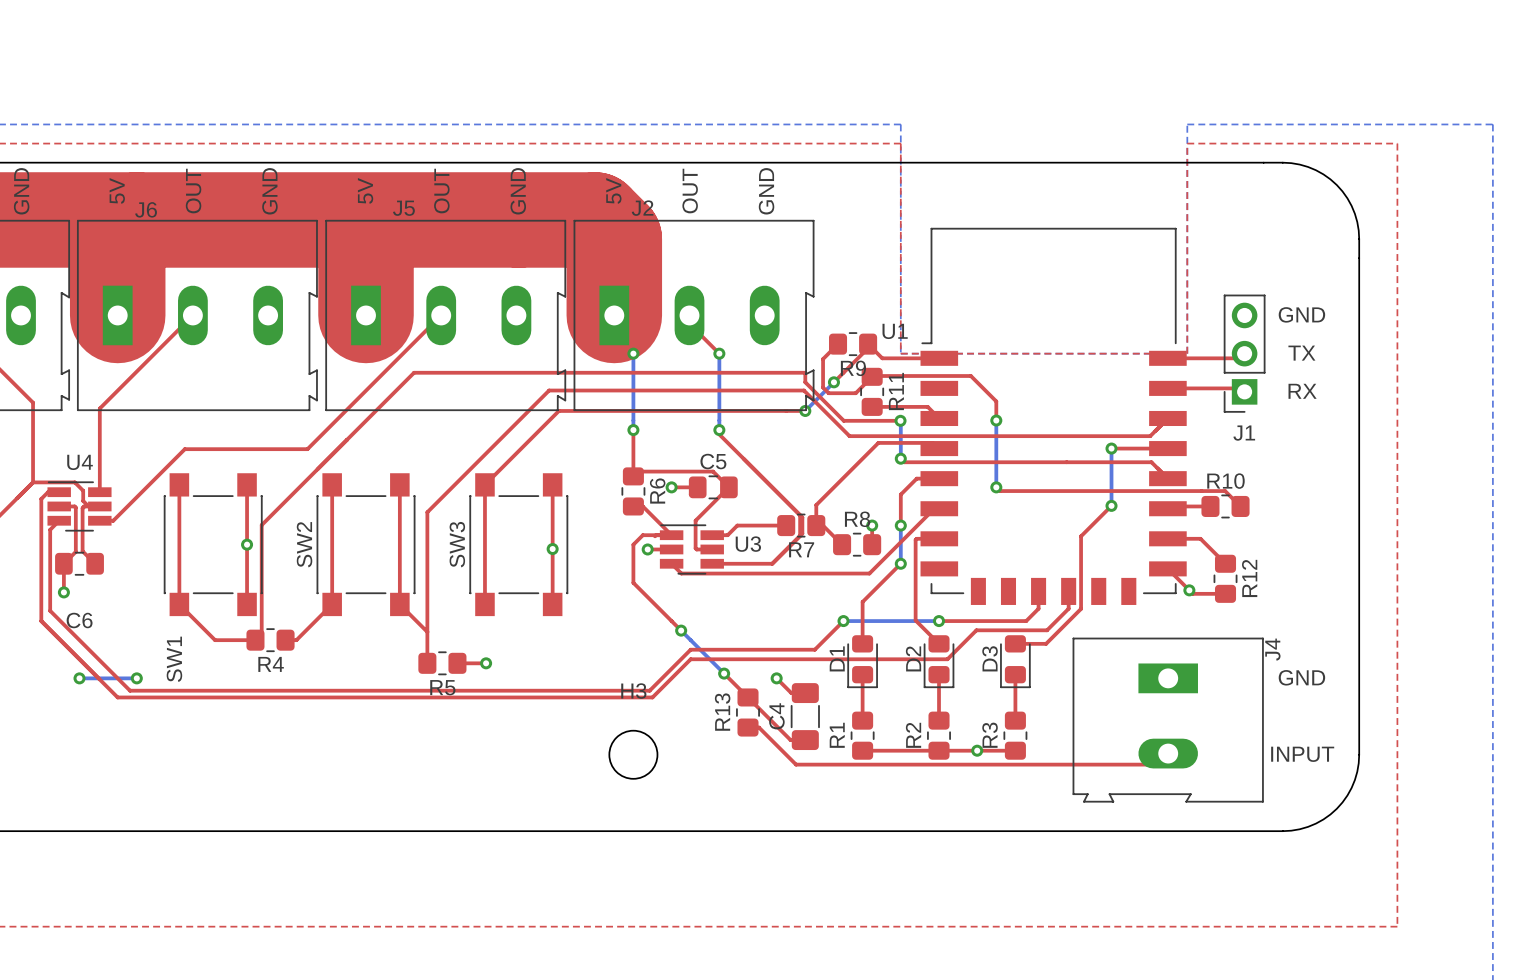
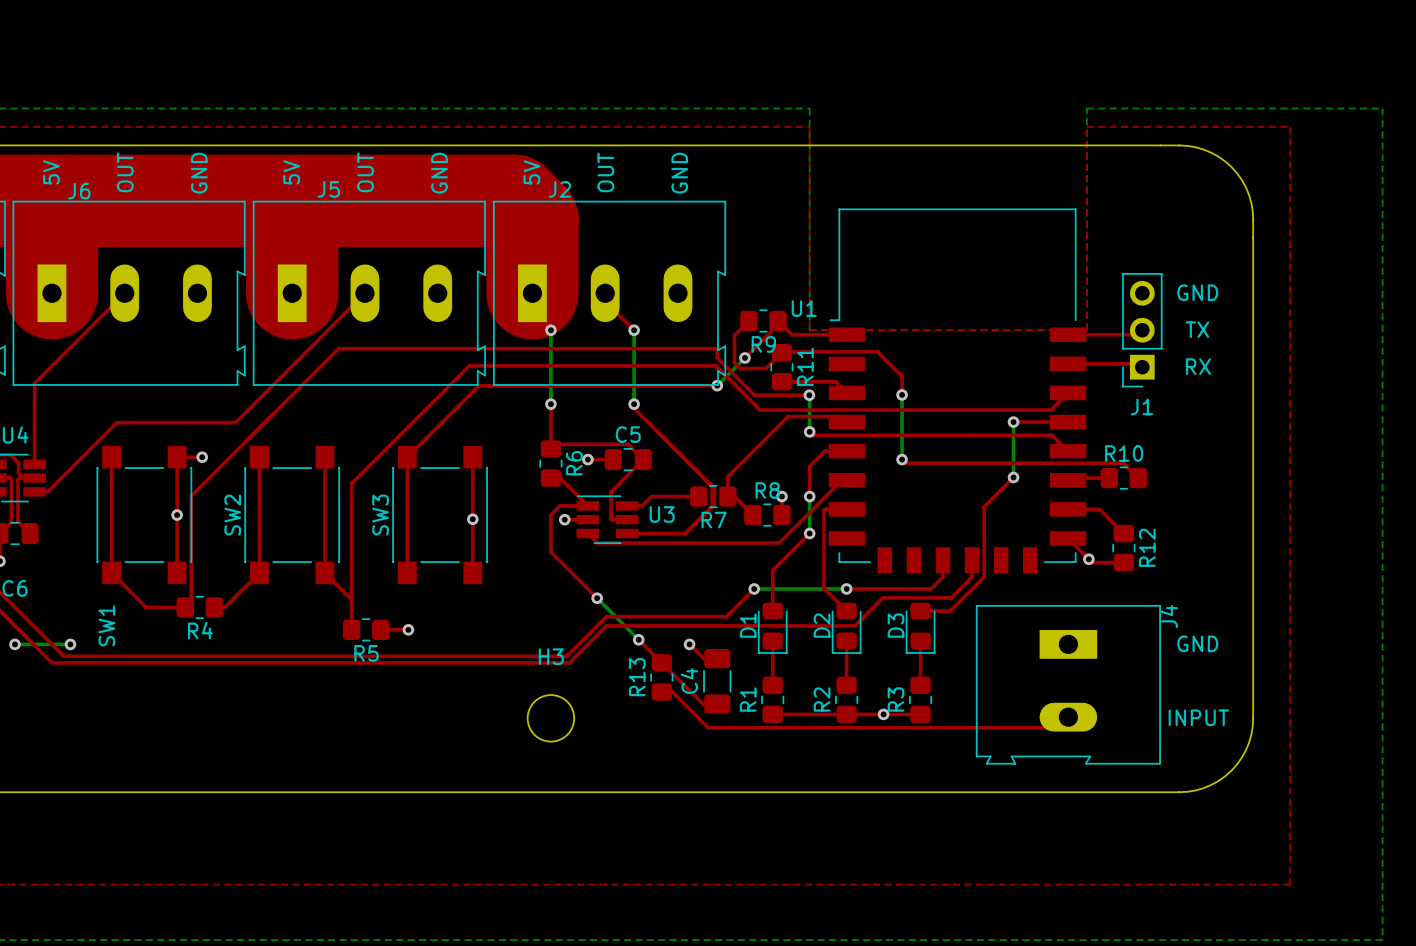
top track: none -> (177, 457) (202, 457)
via: none -> (202, 457)

